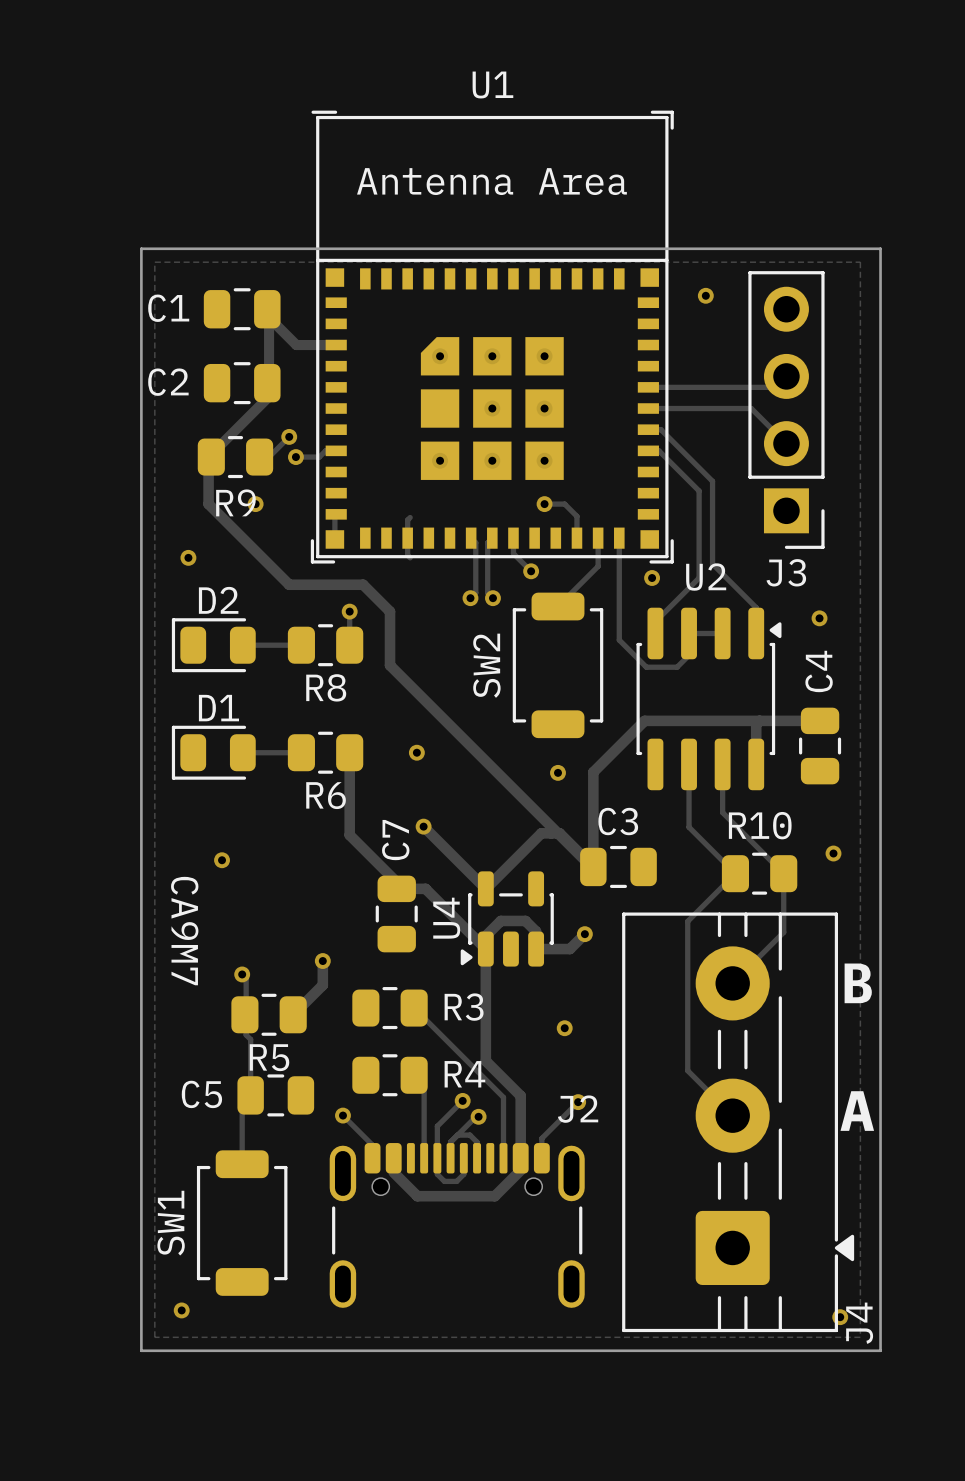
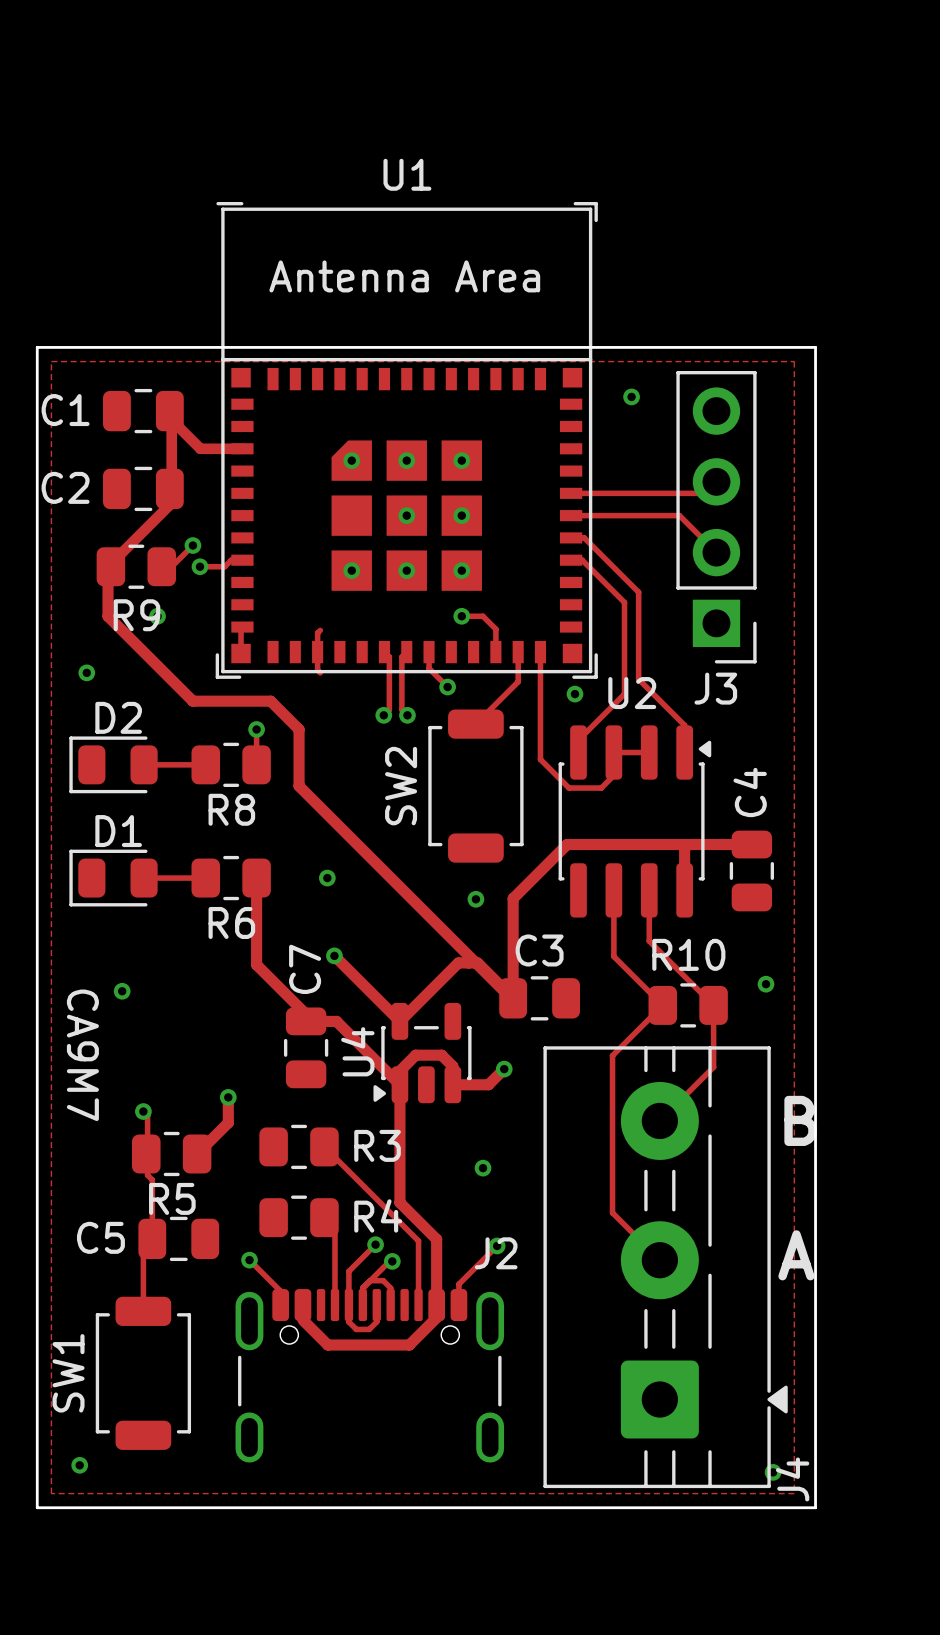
via: (819, 618) -> none

